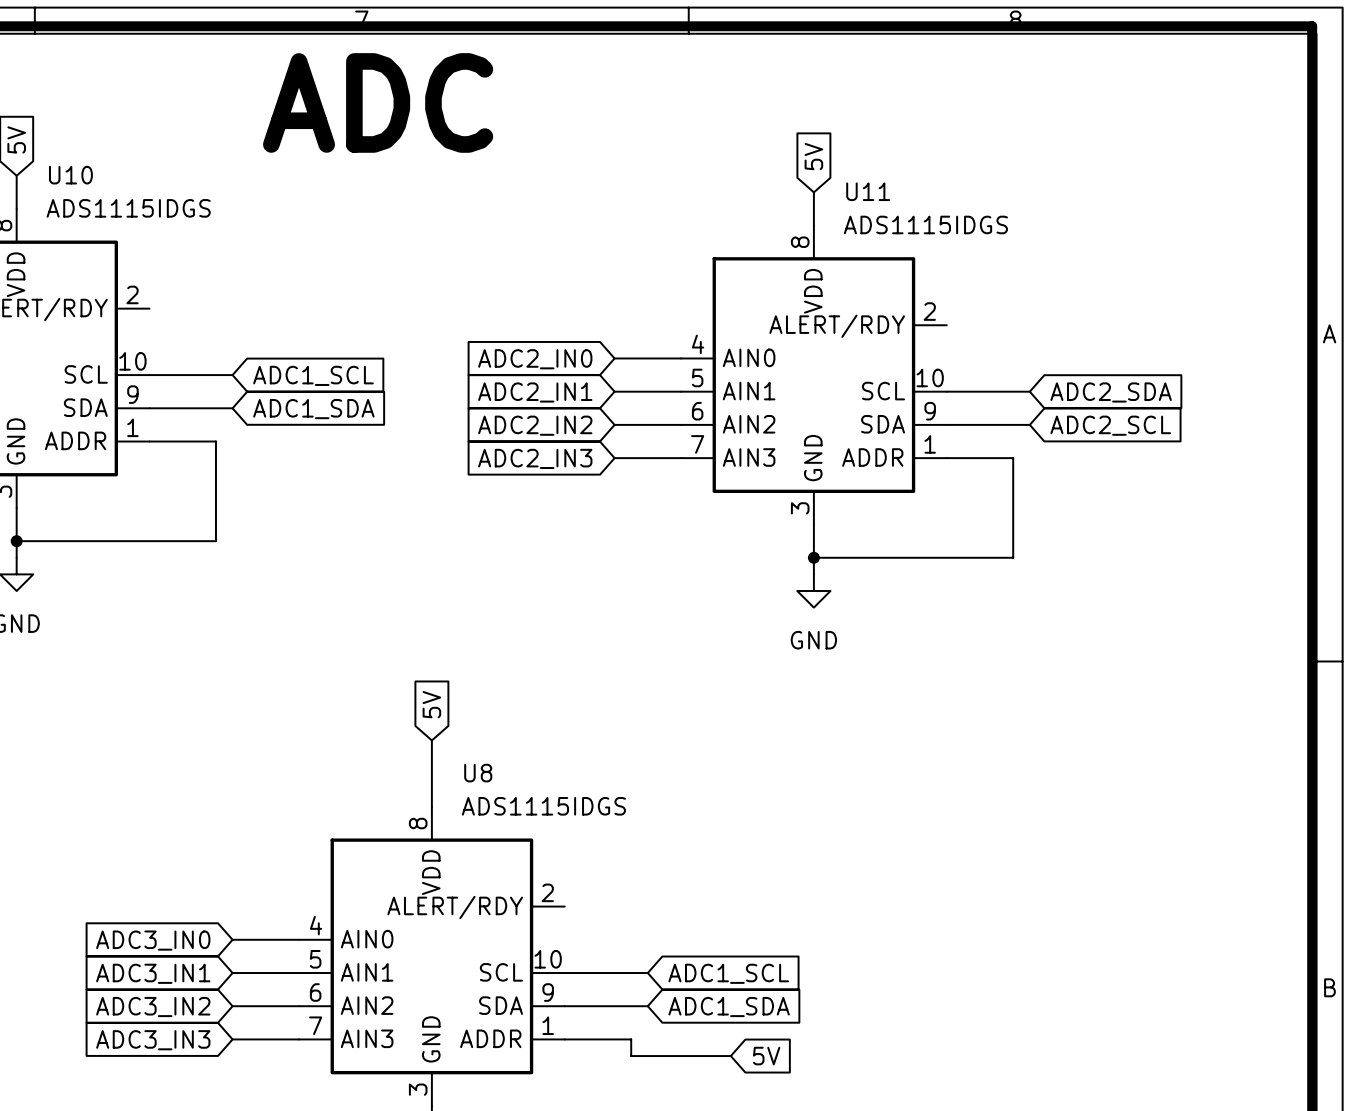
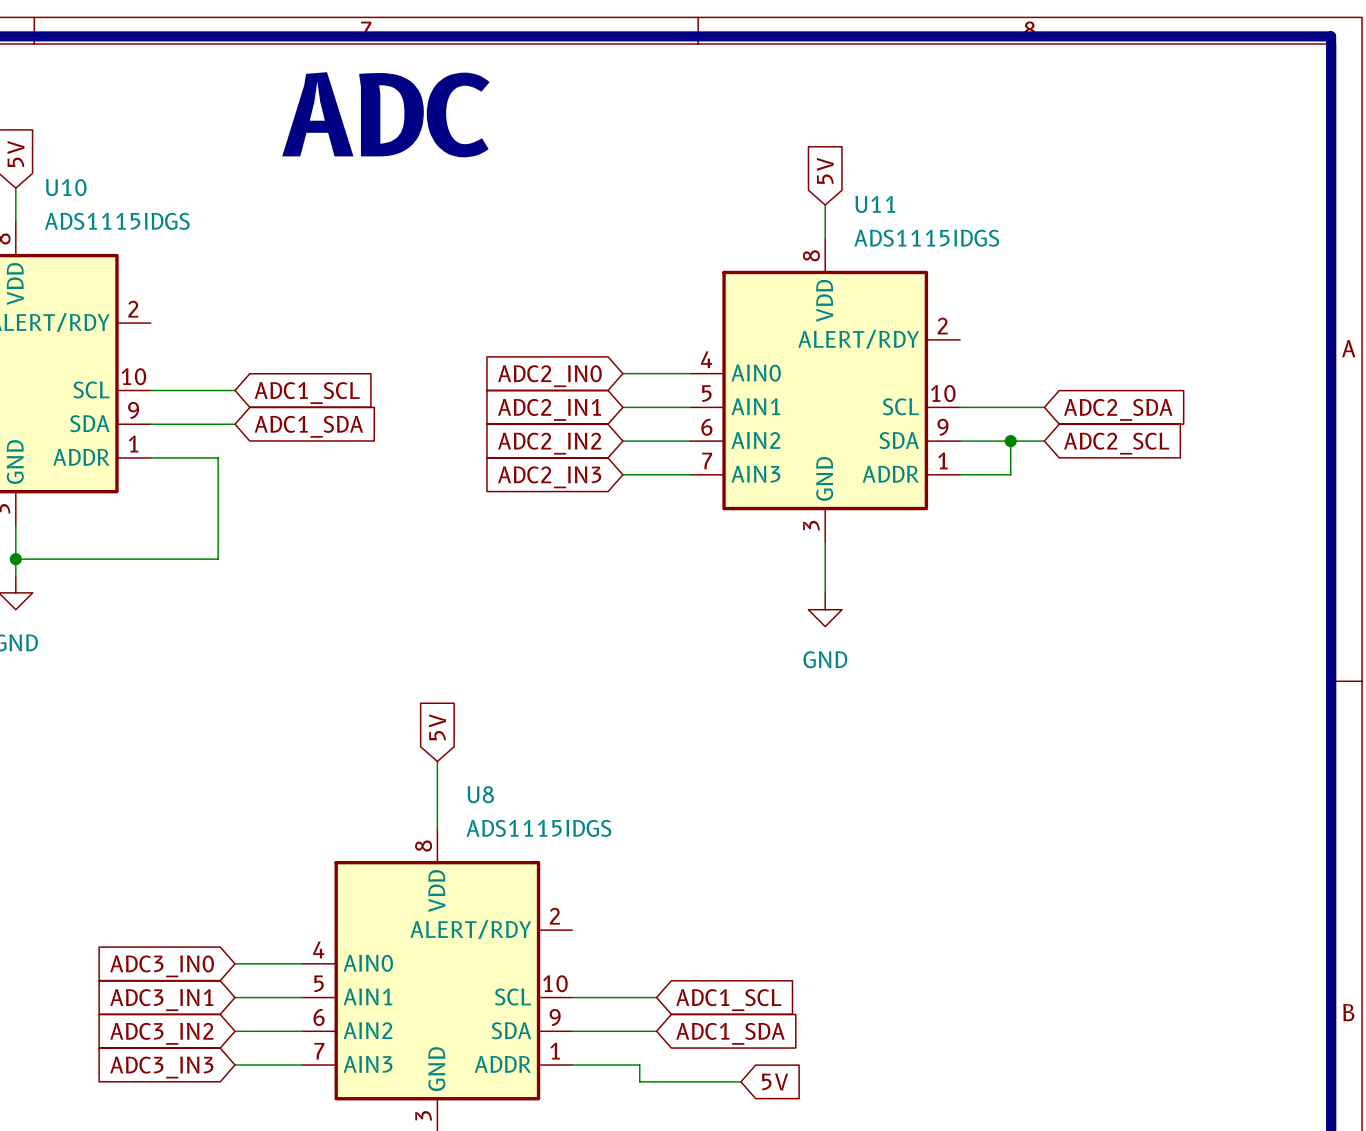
junction: none -> (1010, 441)
wire: (996, 458) (1013, 458) (1013, 557) (813, 557) -> (1010, 474) (1010, 441)
junction: (813, 557) -> none

